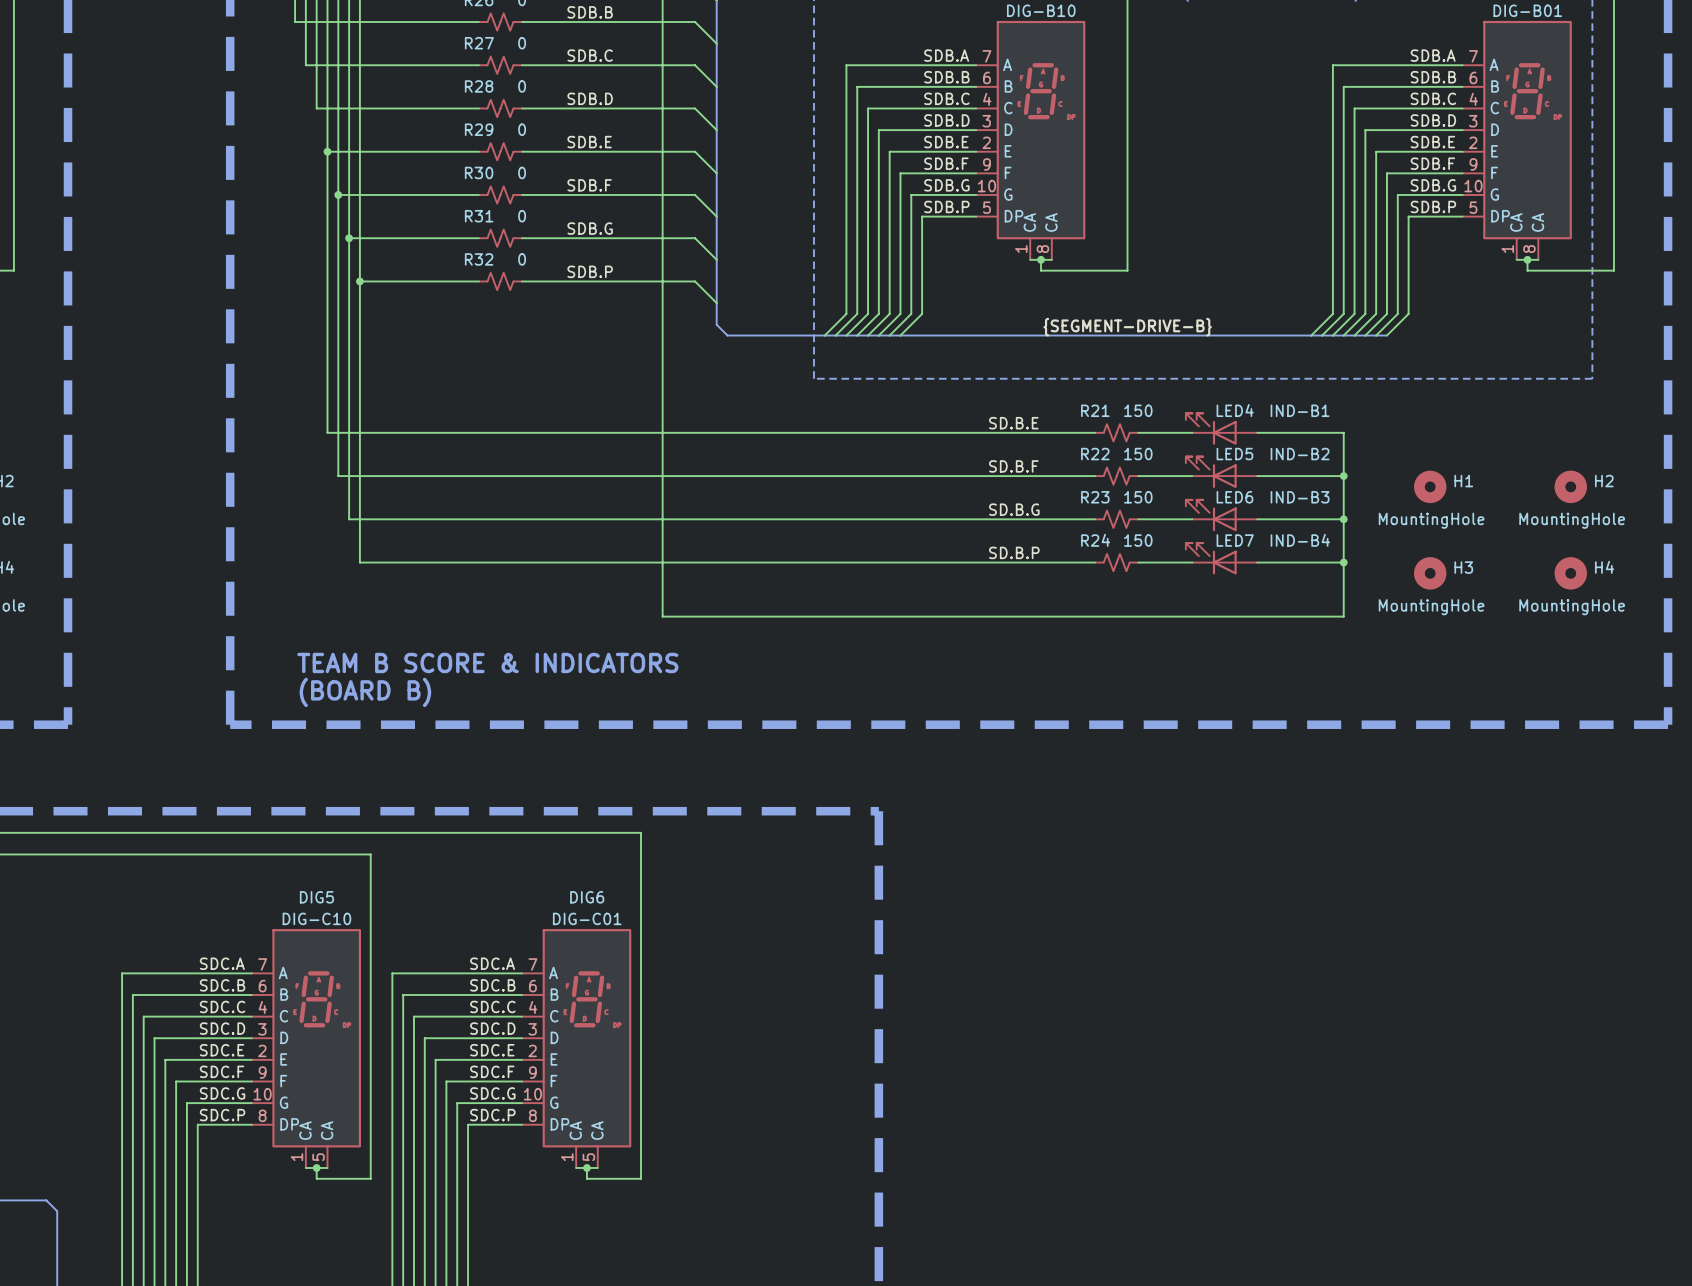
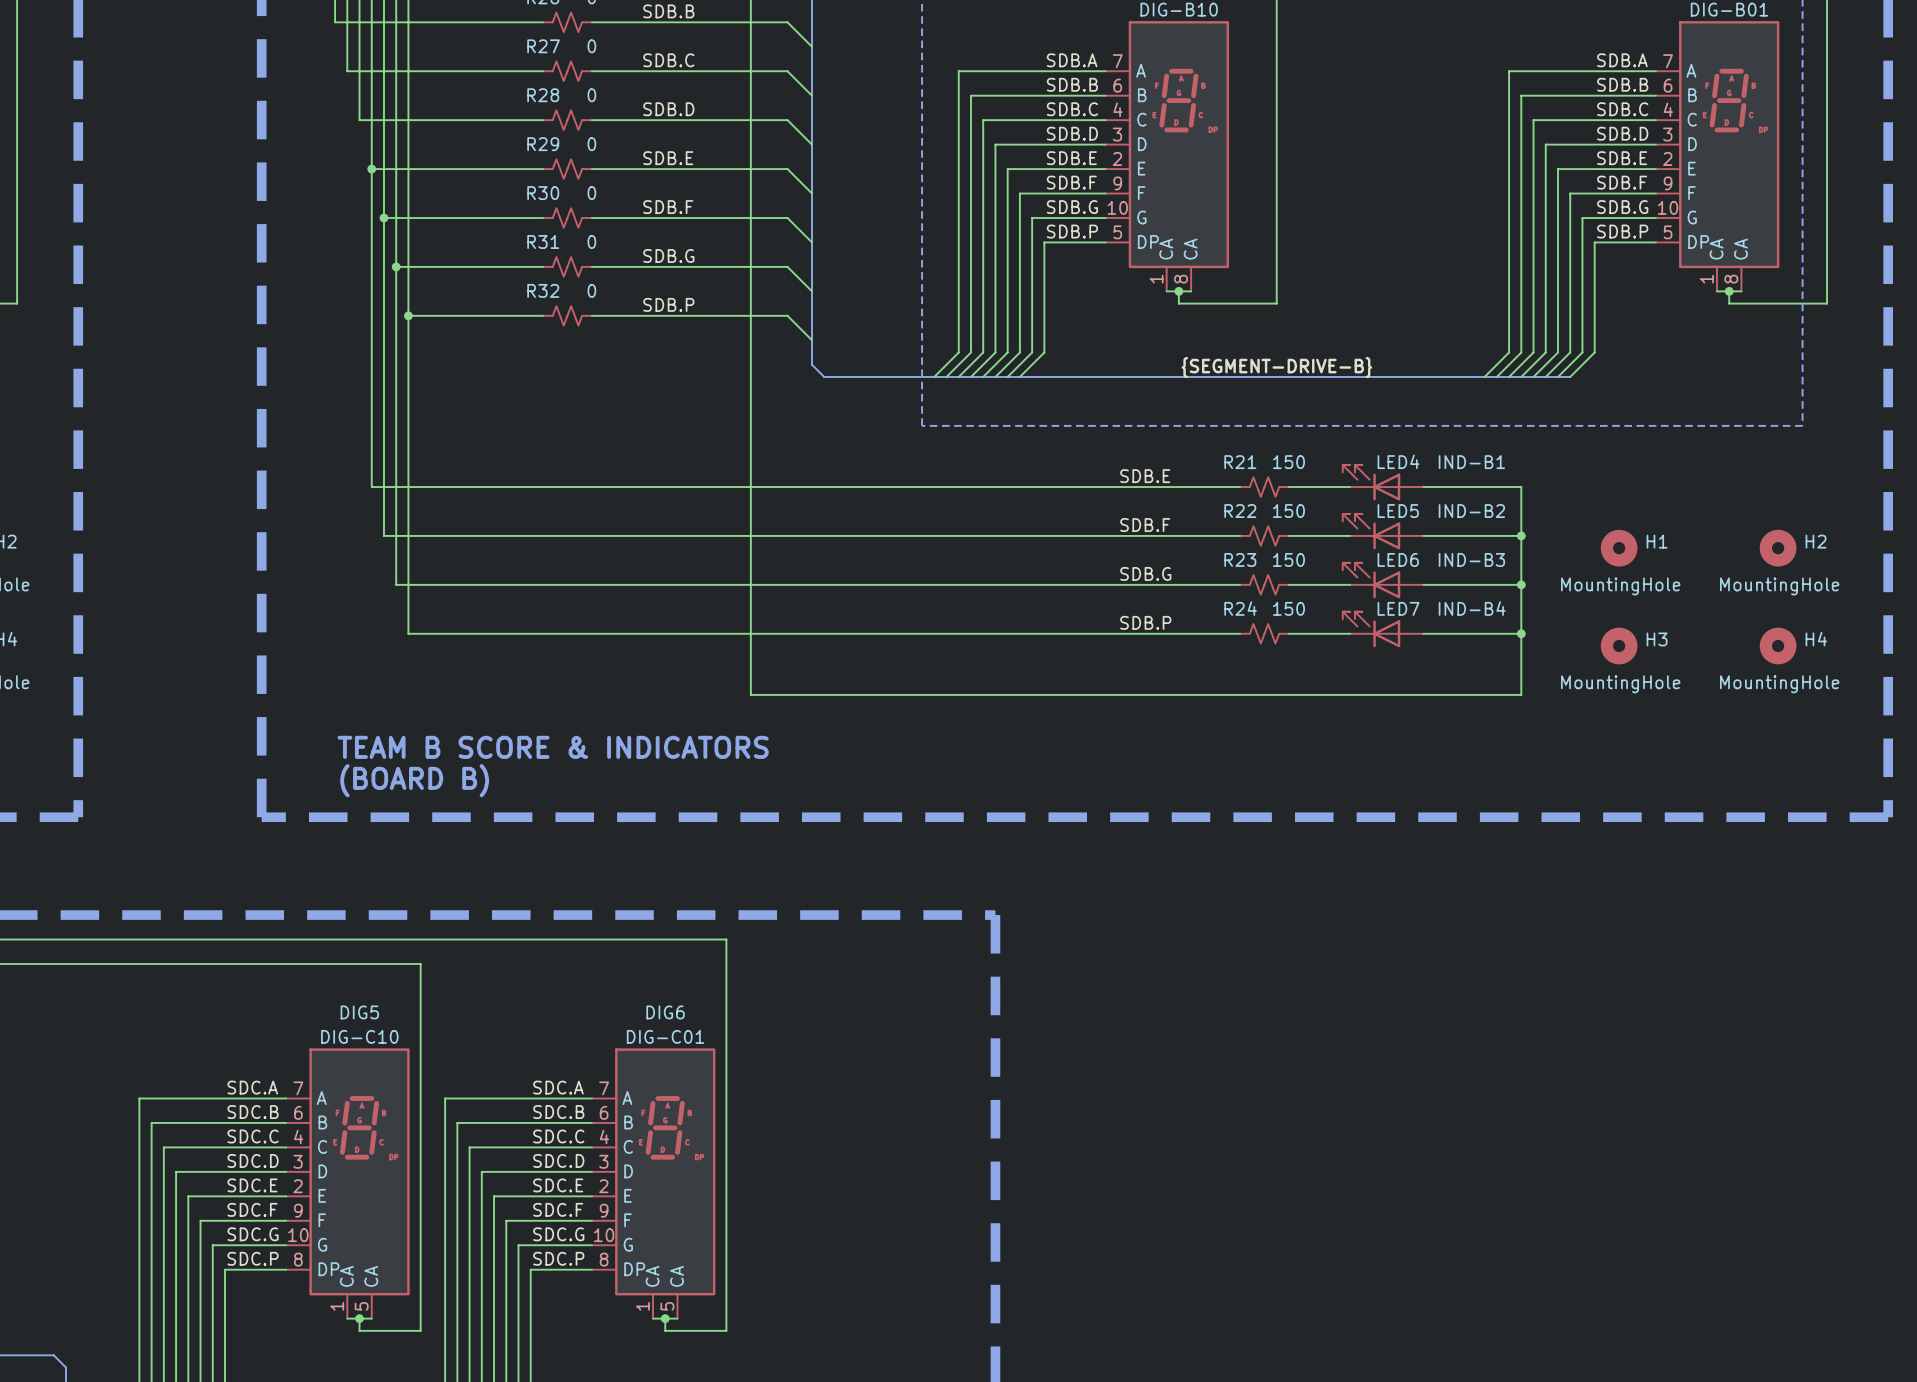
label: SD.B.E (1013, 423) -> SDB.E (1145, 476)
label: SD.B.F (1013, 466) -> SDB.F (1145, 525)
label: SD.B.G (1014, 509) -> SDB.G (1145, 573)
label: SD.B.P (1014, 552) -> SDB.P (1145, 622)

